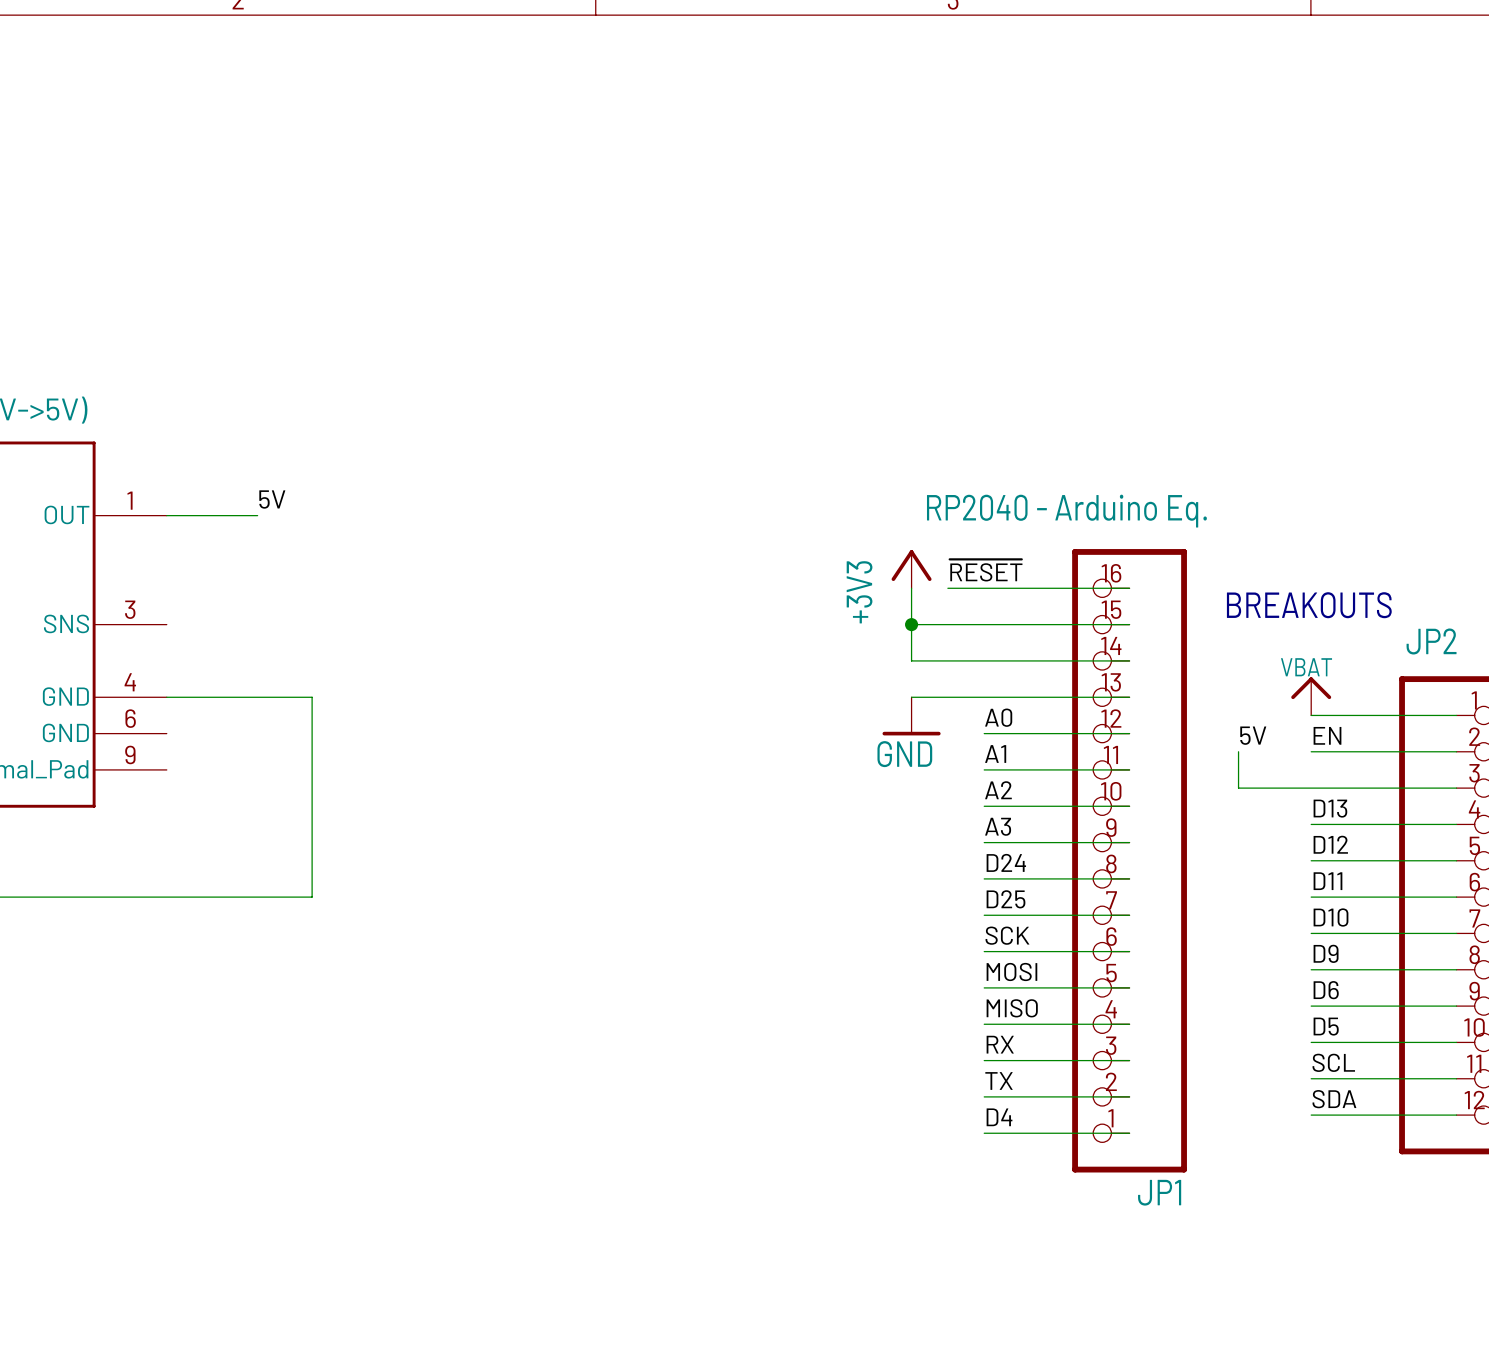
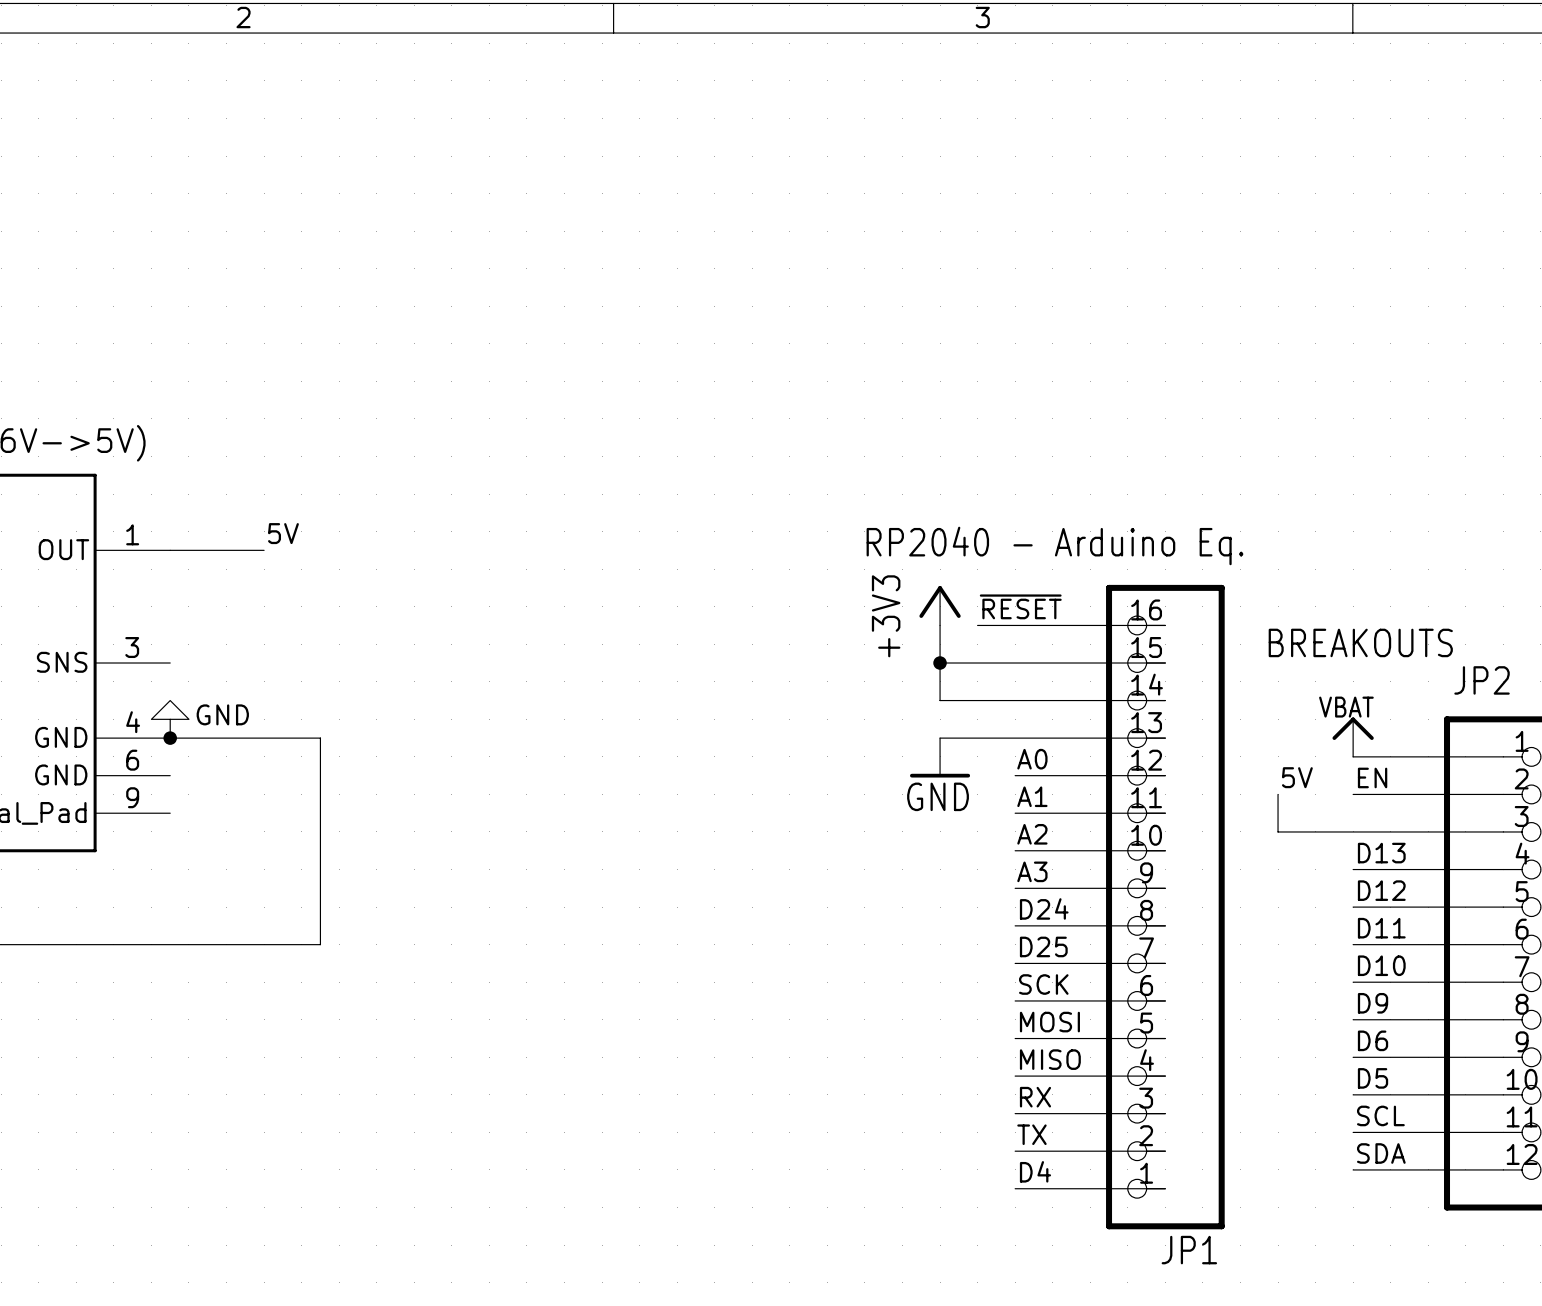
power symbol: none -> GND (170, 719)
junction: none -> (170, 738)

